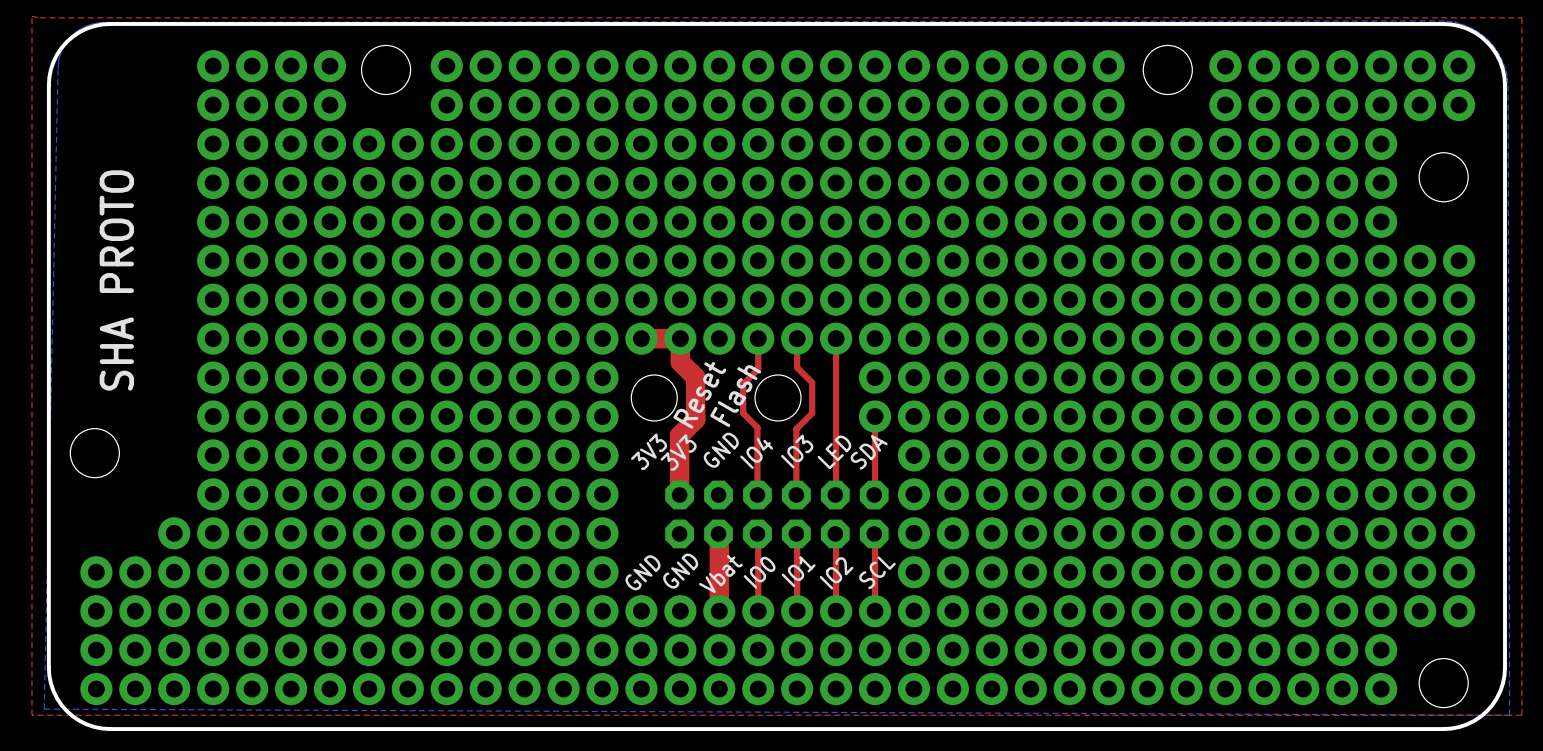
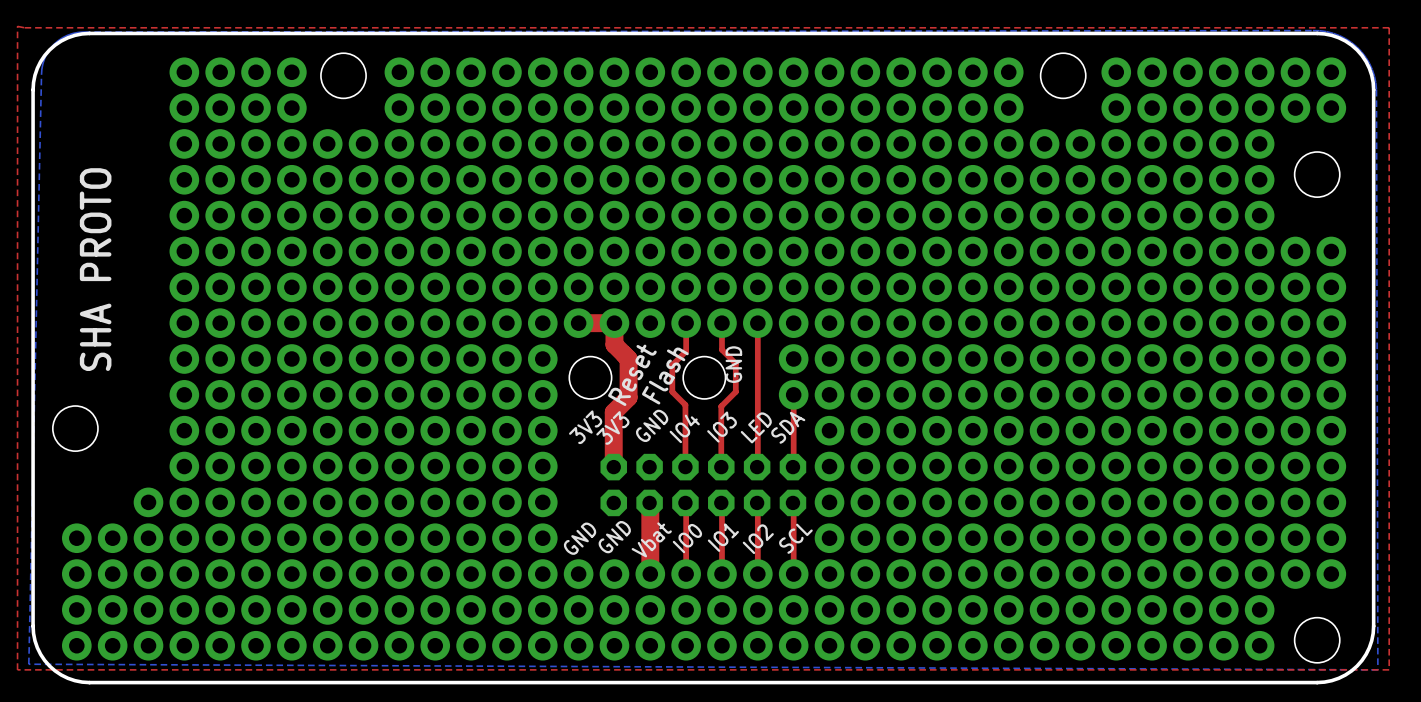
text: none -> GND (733, 364)

